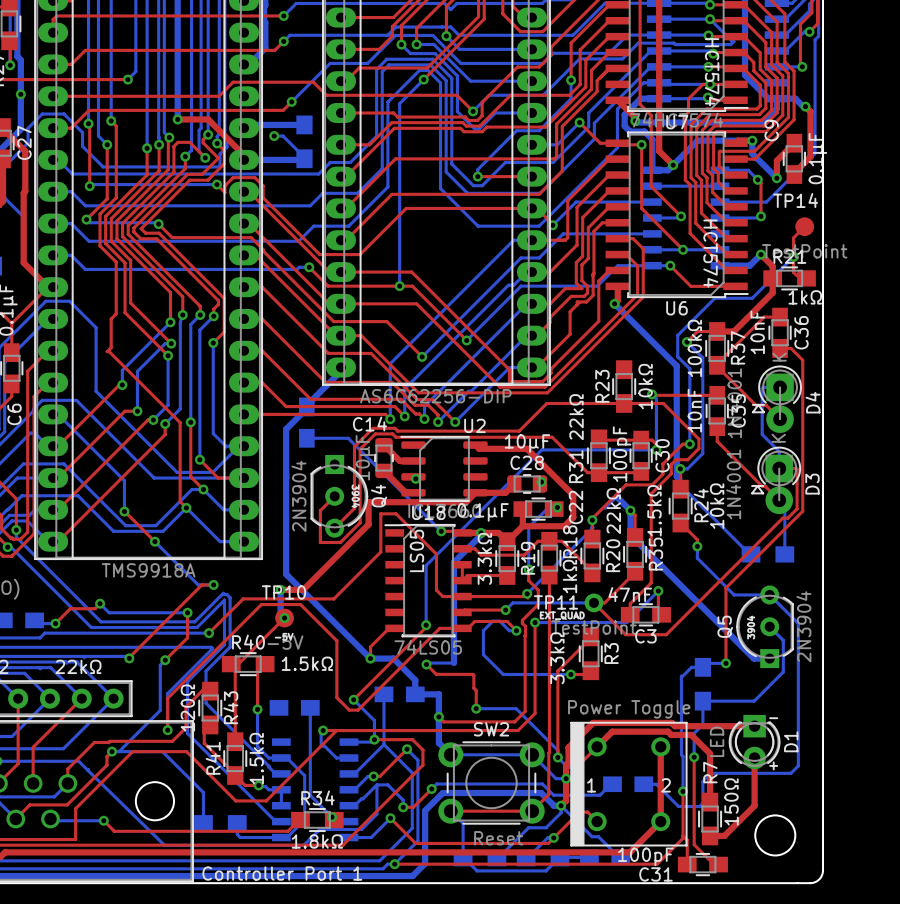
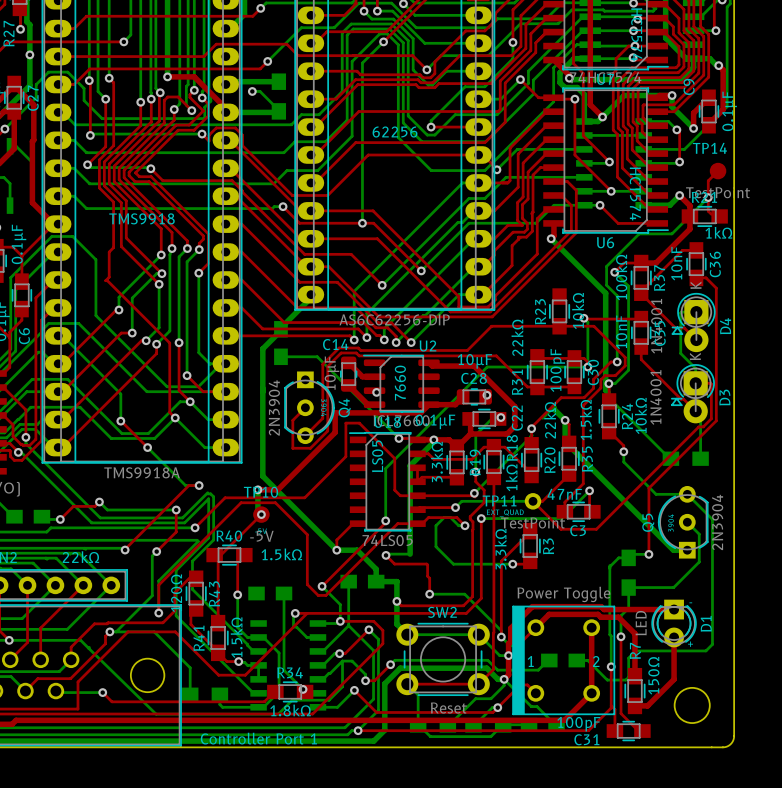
text: none -> 62256 (395, 132)
text: none -> TMS9918 (141, 218)
text: none -> 7660 (400, 383)

